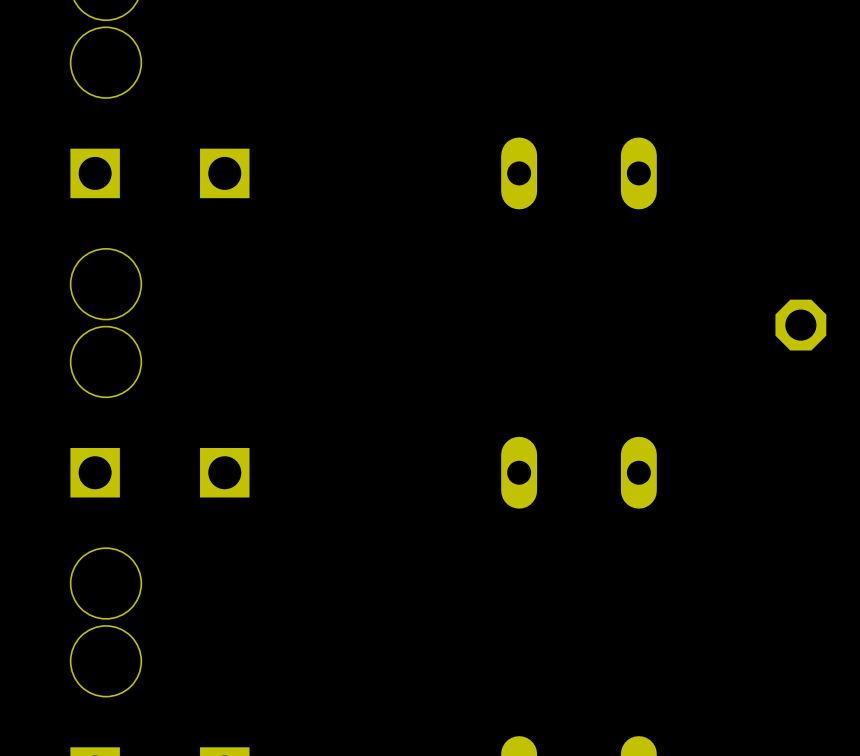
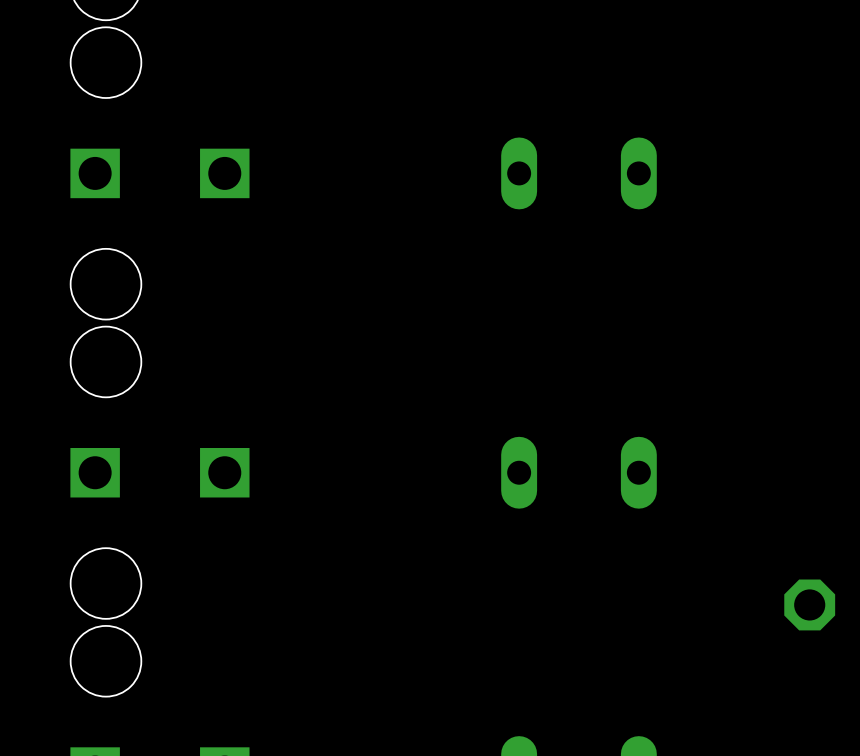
part position: (800, 325) -> (809, 604)

